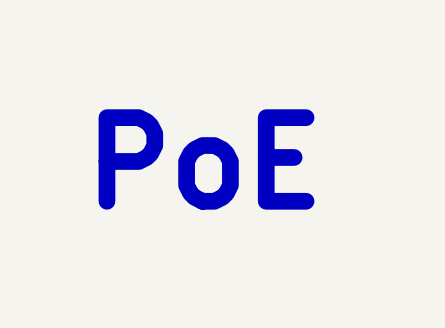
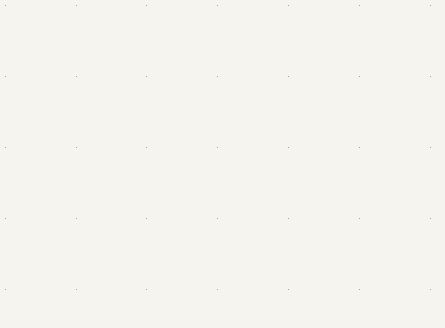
text: PoE (206, 159) -> none

